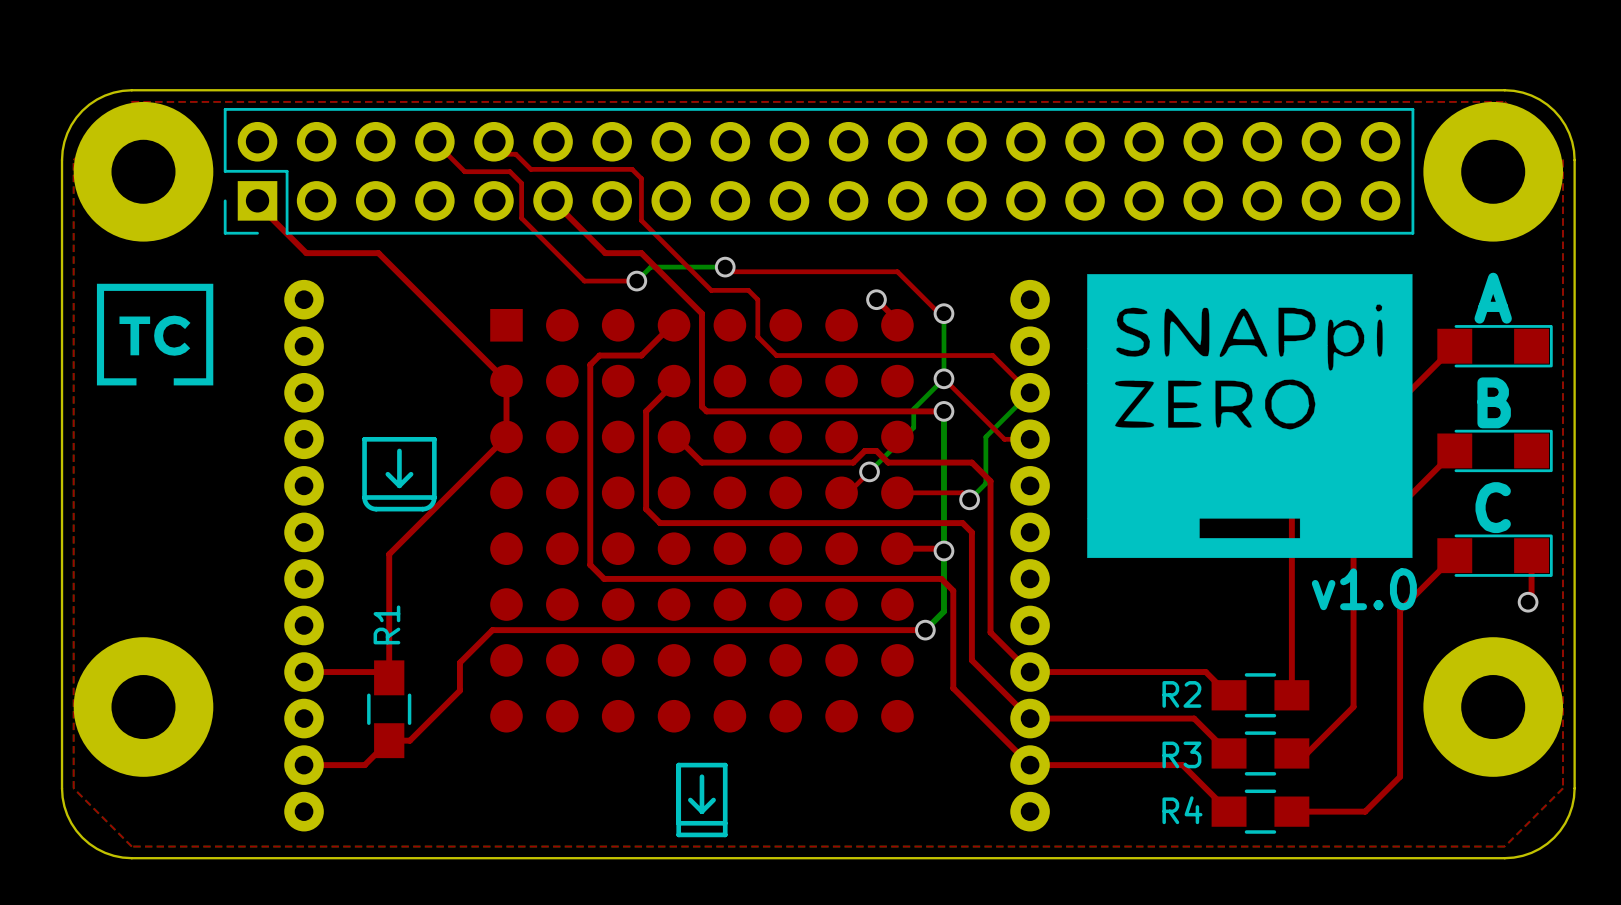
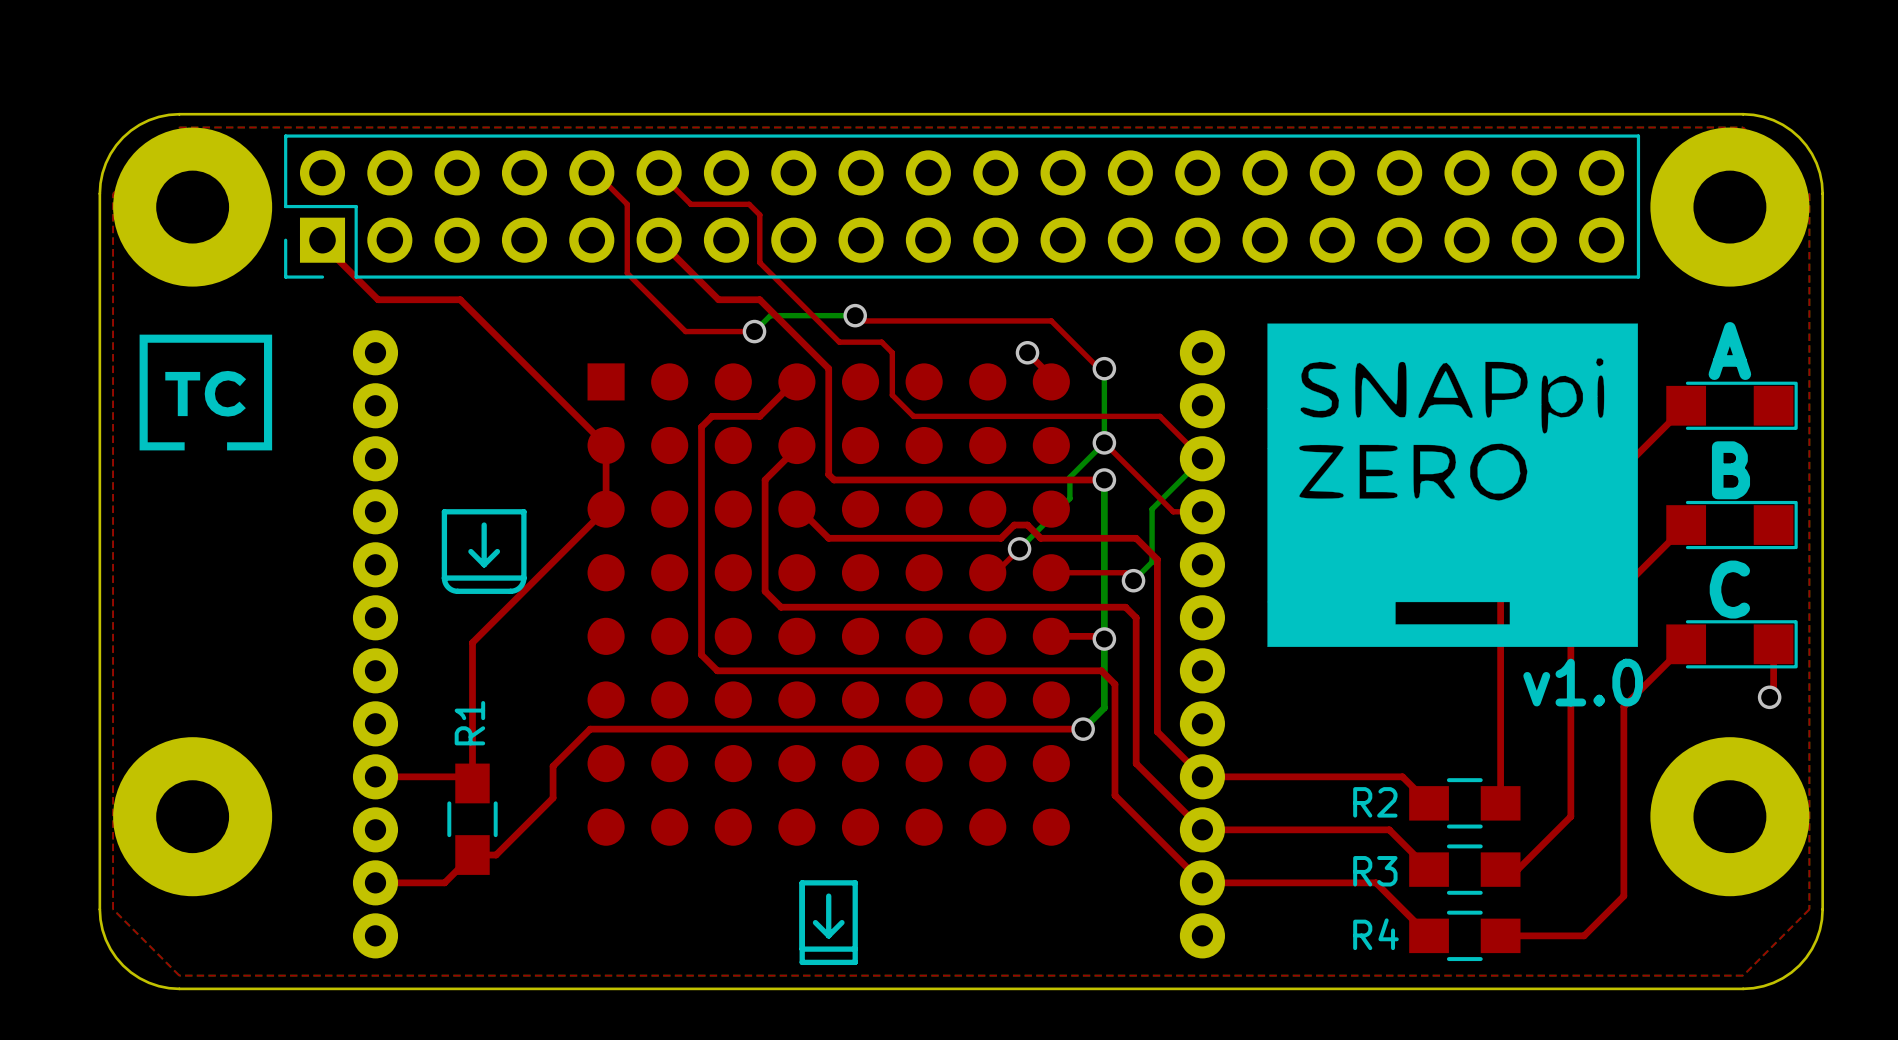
top track: (434, 141) (464, 171) (509, 171) (521, 183) (521, 218) (584, 281) -> (591, 172) (595, 172) (627, 204) (627, 273) (685, 331) (694, 331)
top track: (493, 141) (506, 154) (515, 154) (530, 169) (580, 169) -> (659, 172) (690, 204)

